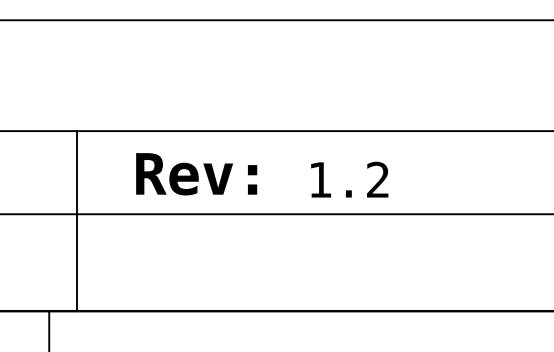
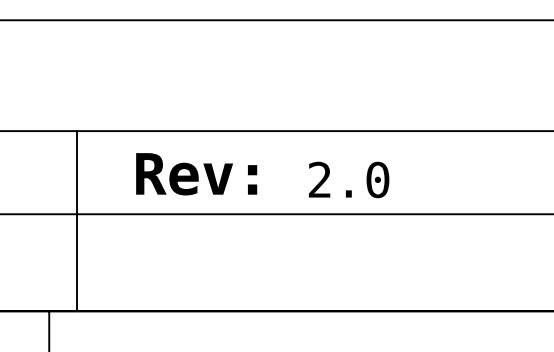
text: 1.2 (349, 179) -> 2.0 (349, 179)

